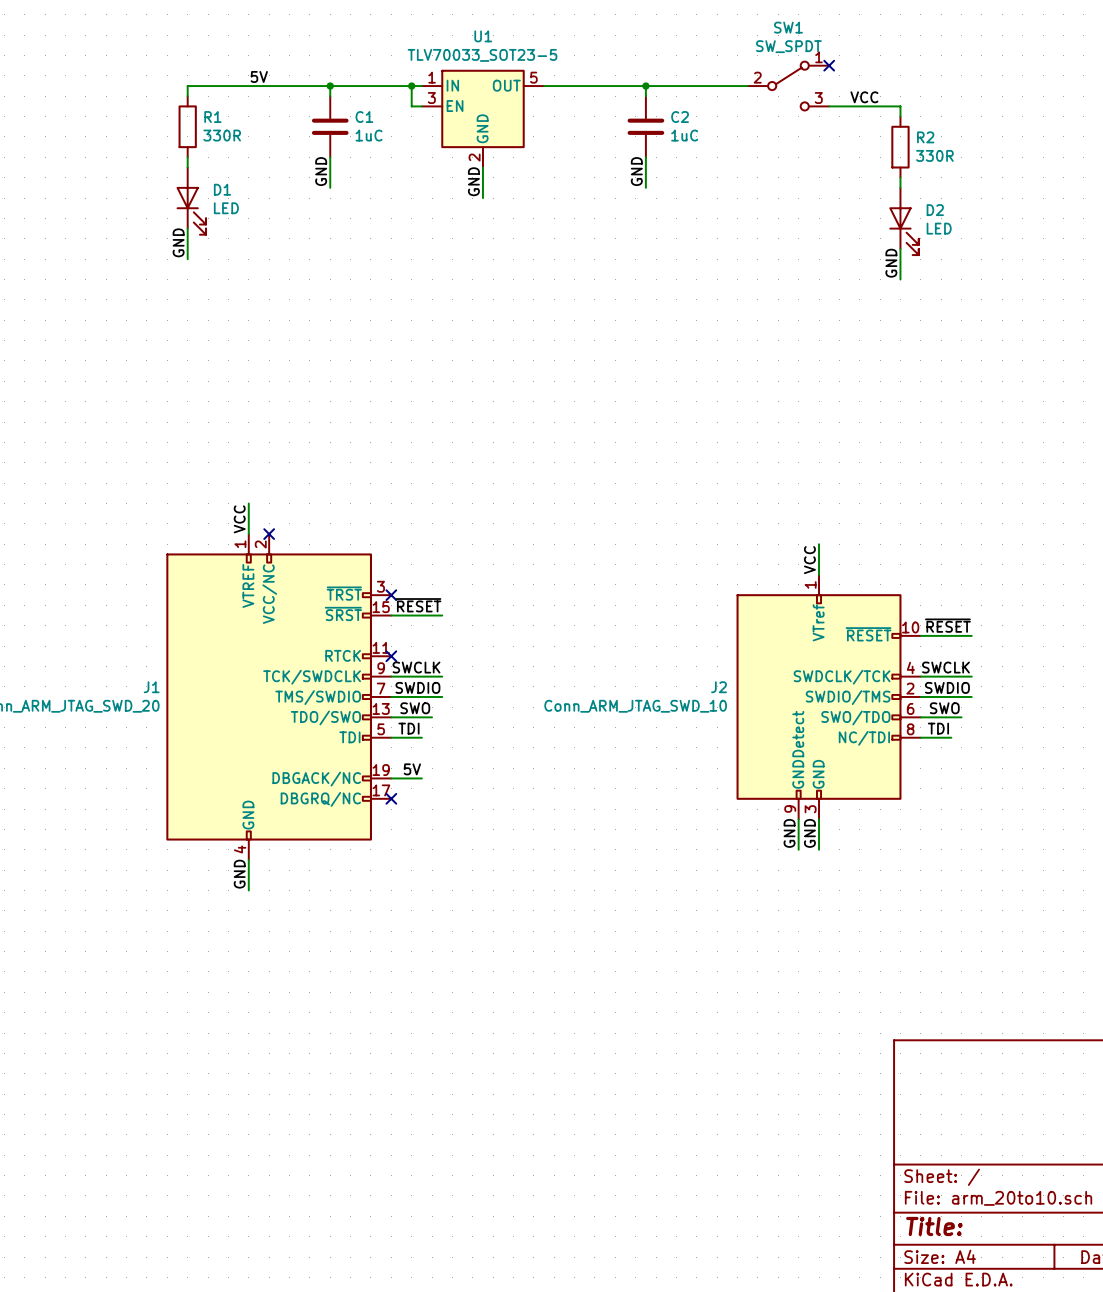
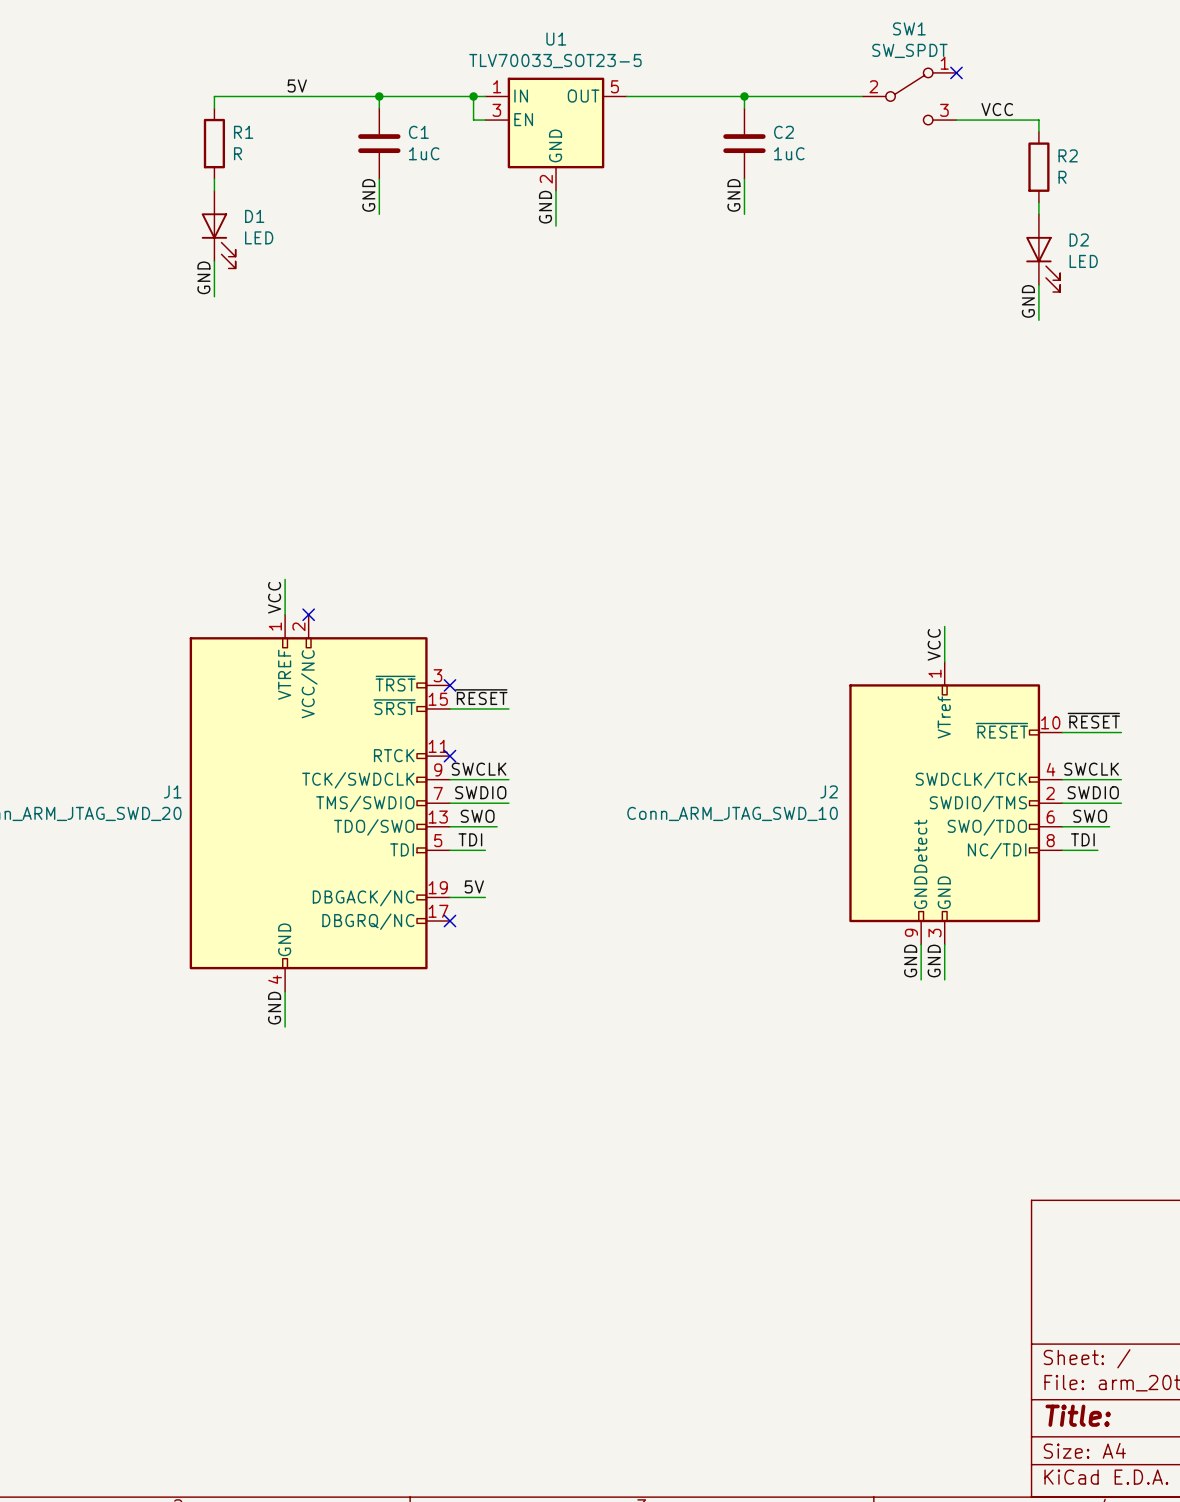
R1 value: 330R (222, 135) -> R (238, 153)
R2 value: 330R (934, 155) -> R (1062, 177)

